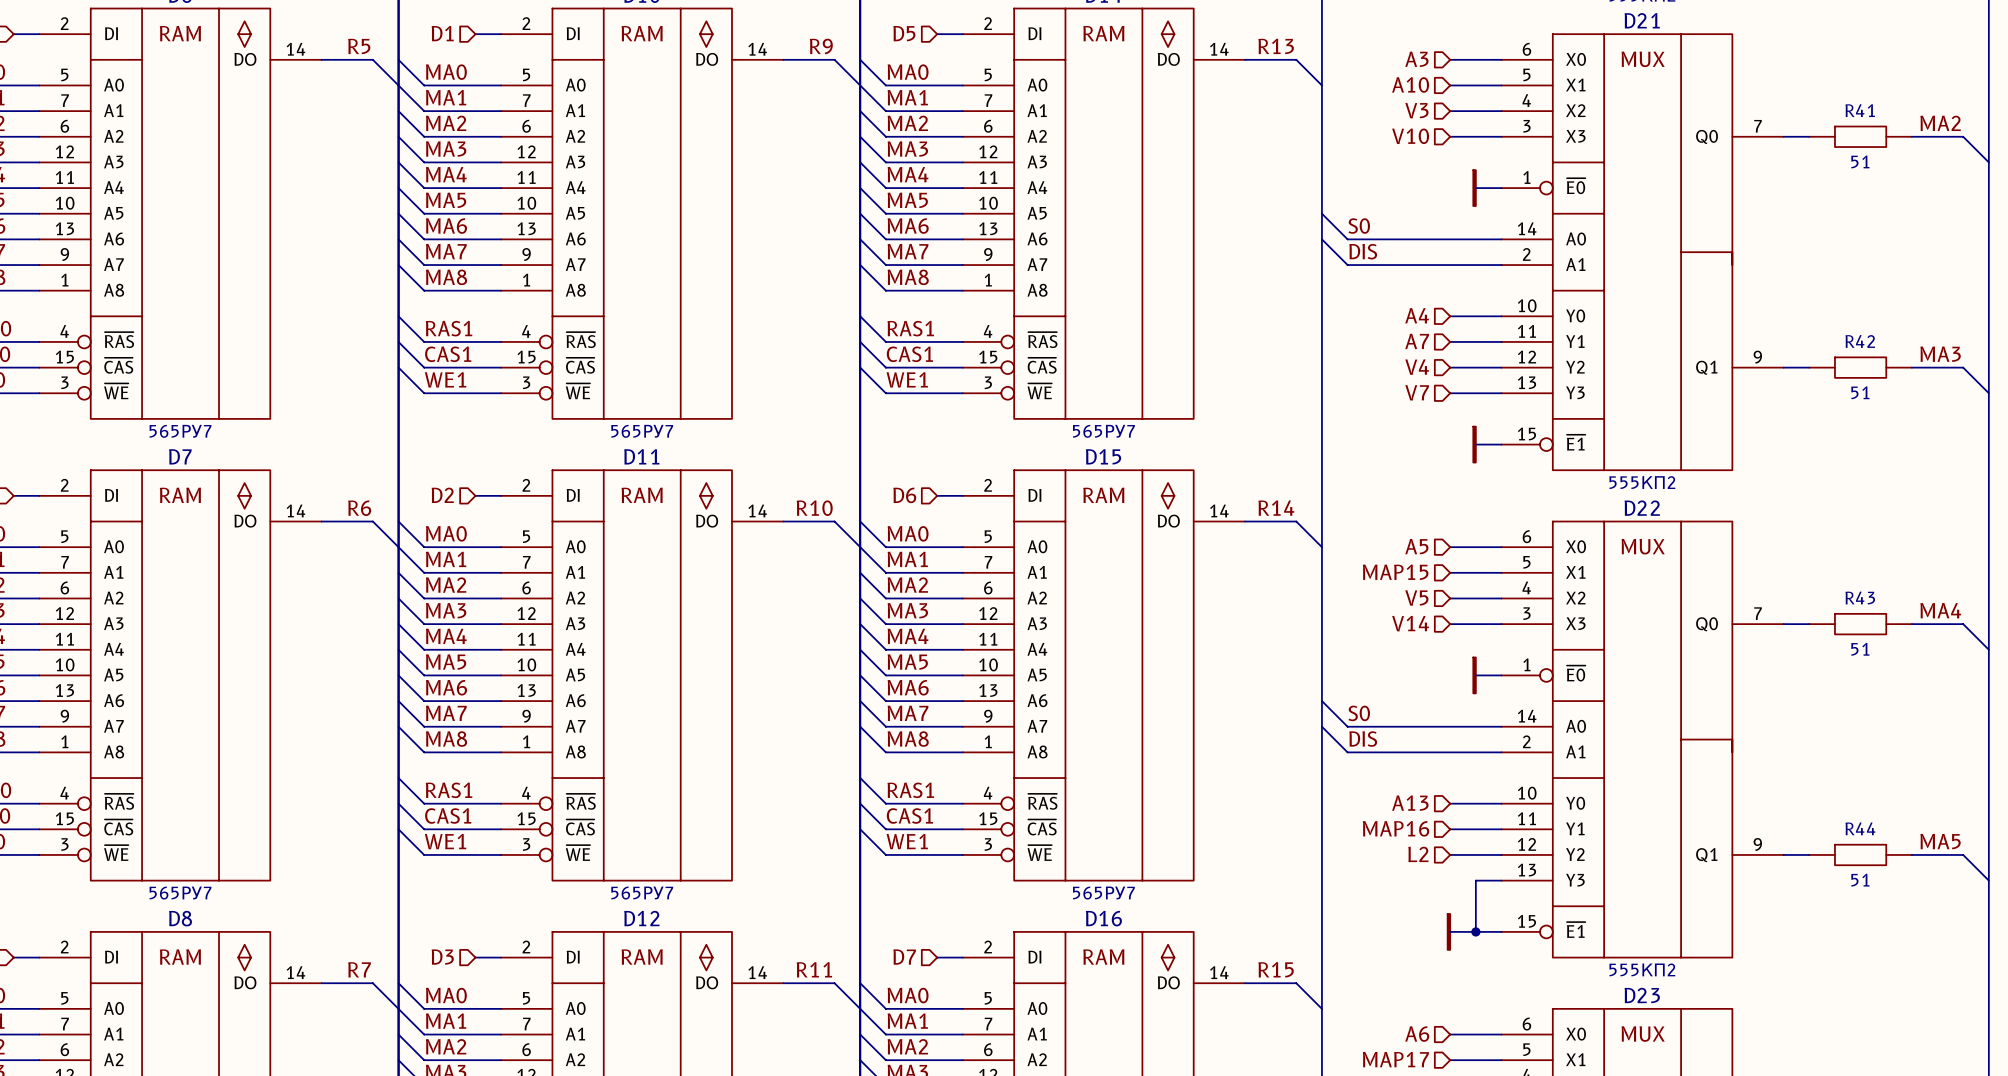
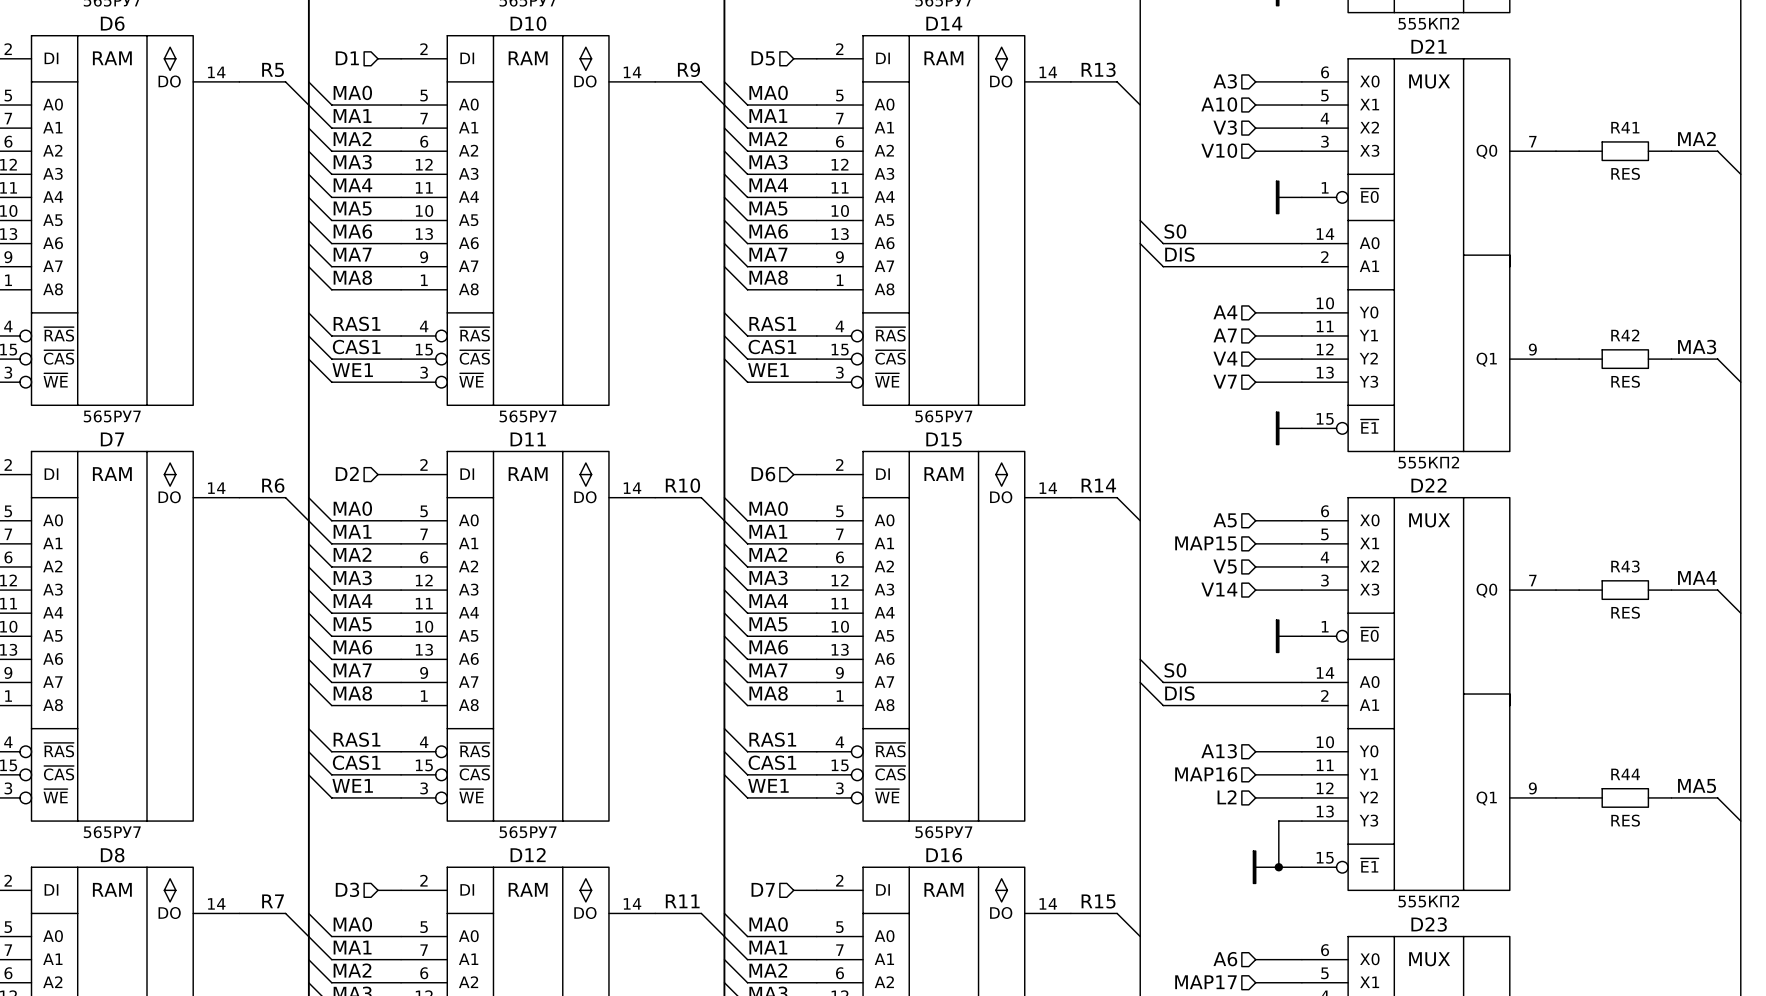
R41 value: 51 (1860, 161) -> RES (1625, 173)
R42 value: 51 (1860, 392) -> RES (1625, 381)
R43 value: 51 (1860, 649) -> RES (1625, 612)
R44 value: 51 (1860, 880) -> RES (1625, 820)

